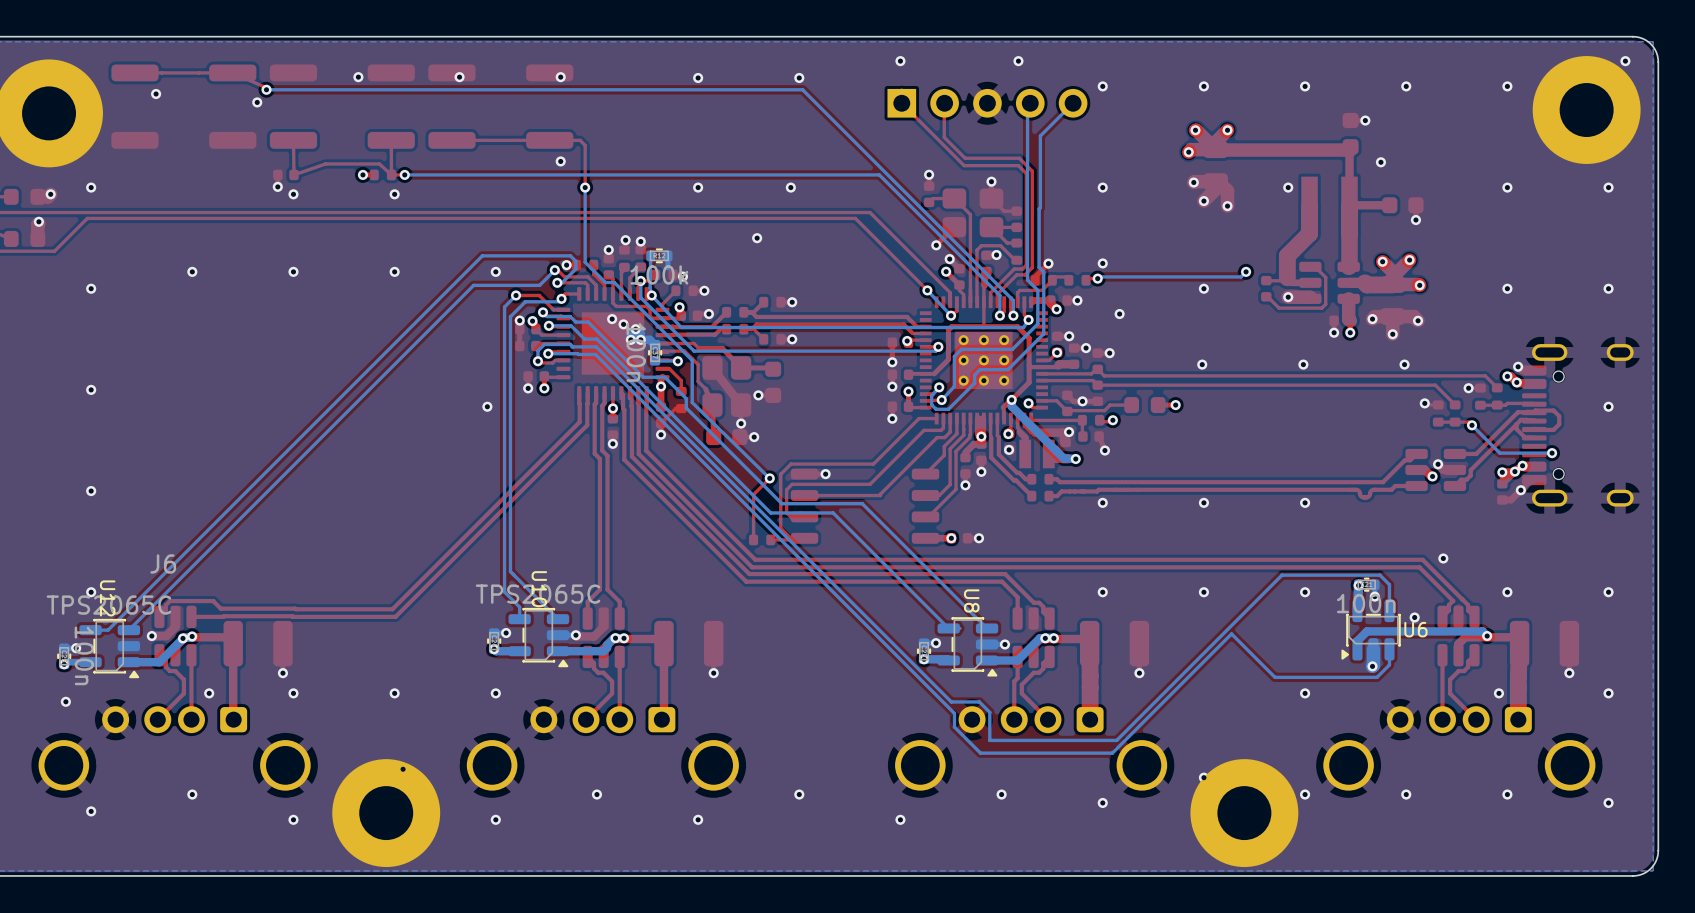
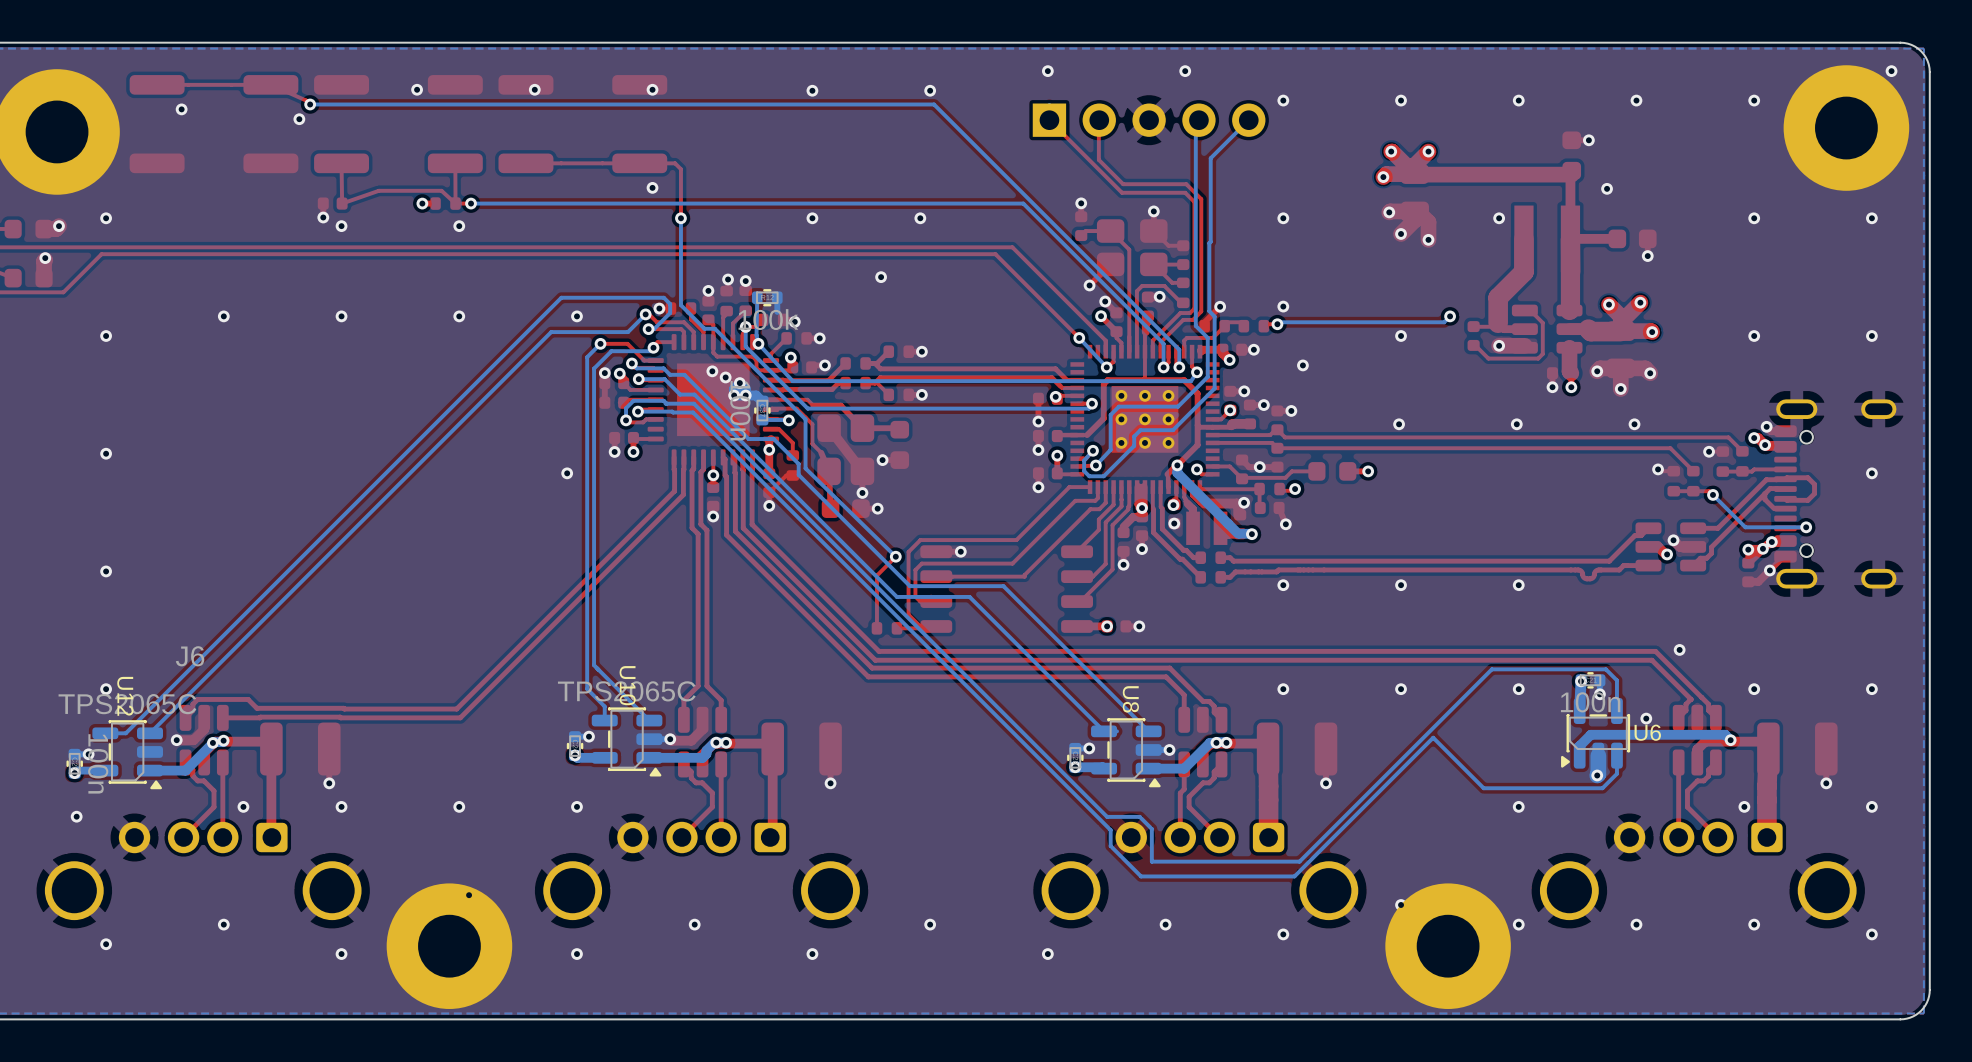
part footprint: [1522, 344, 1634, 507] -> [1774, 399, 1897, 589]

